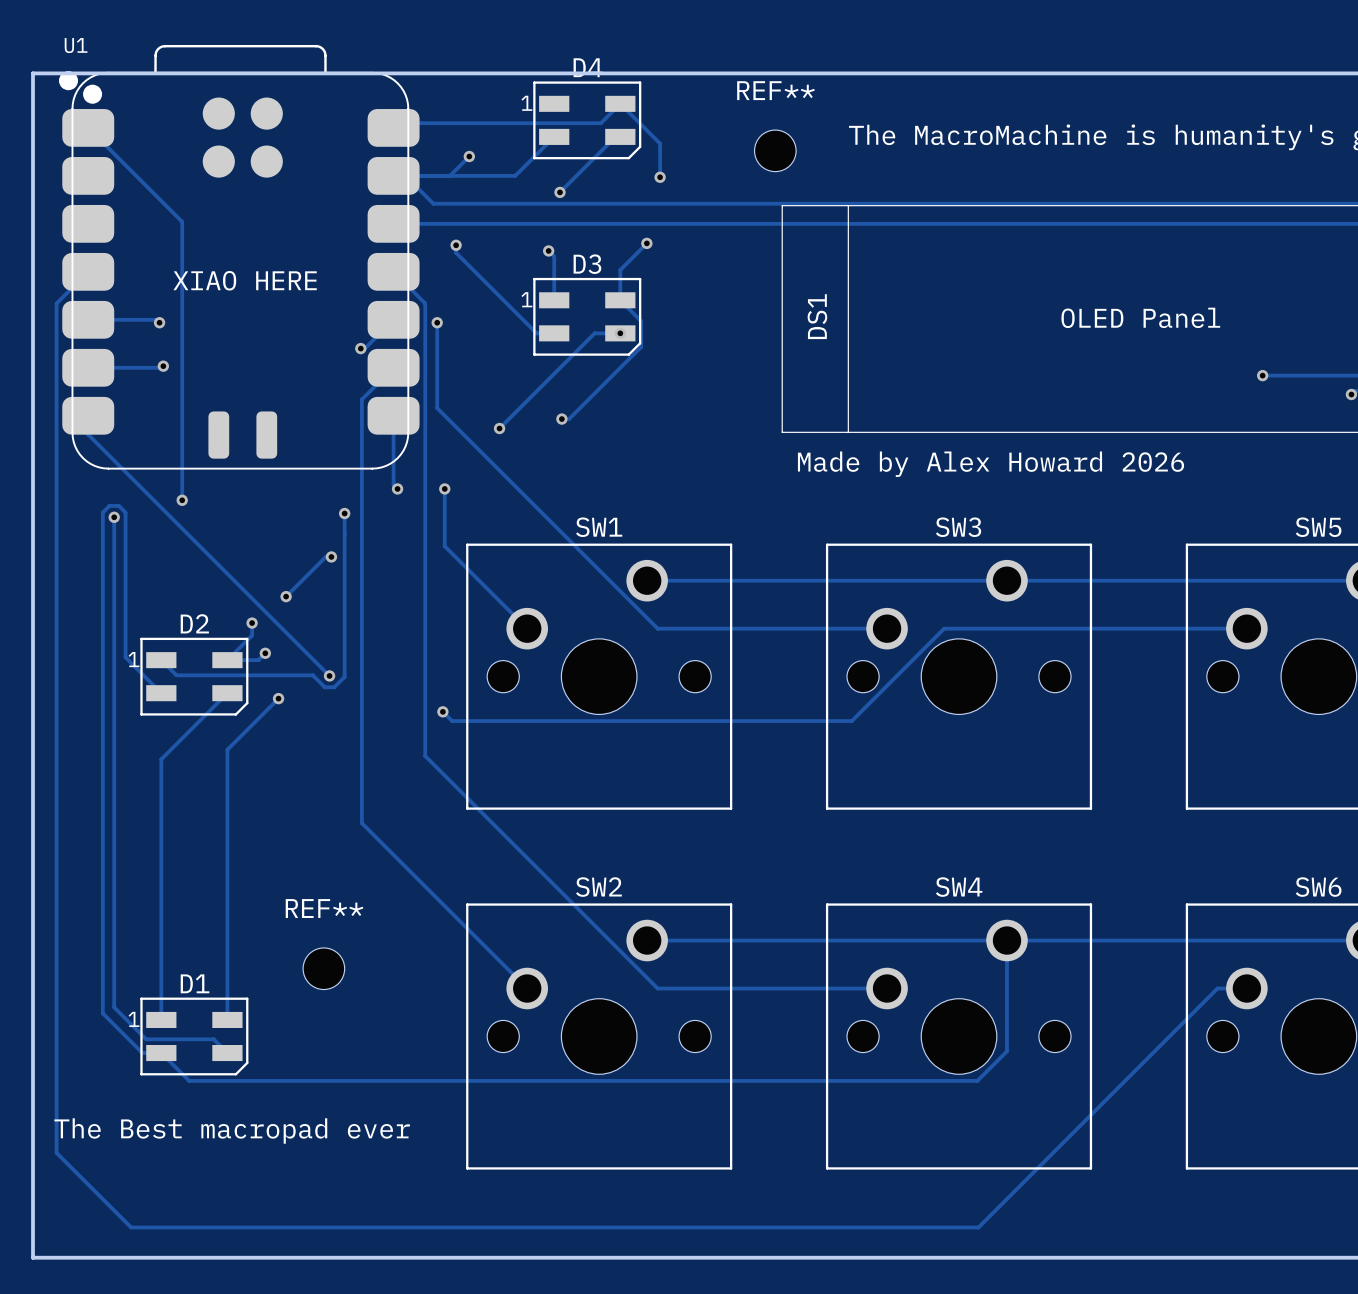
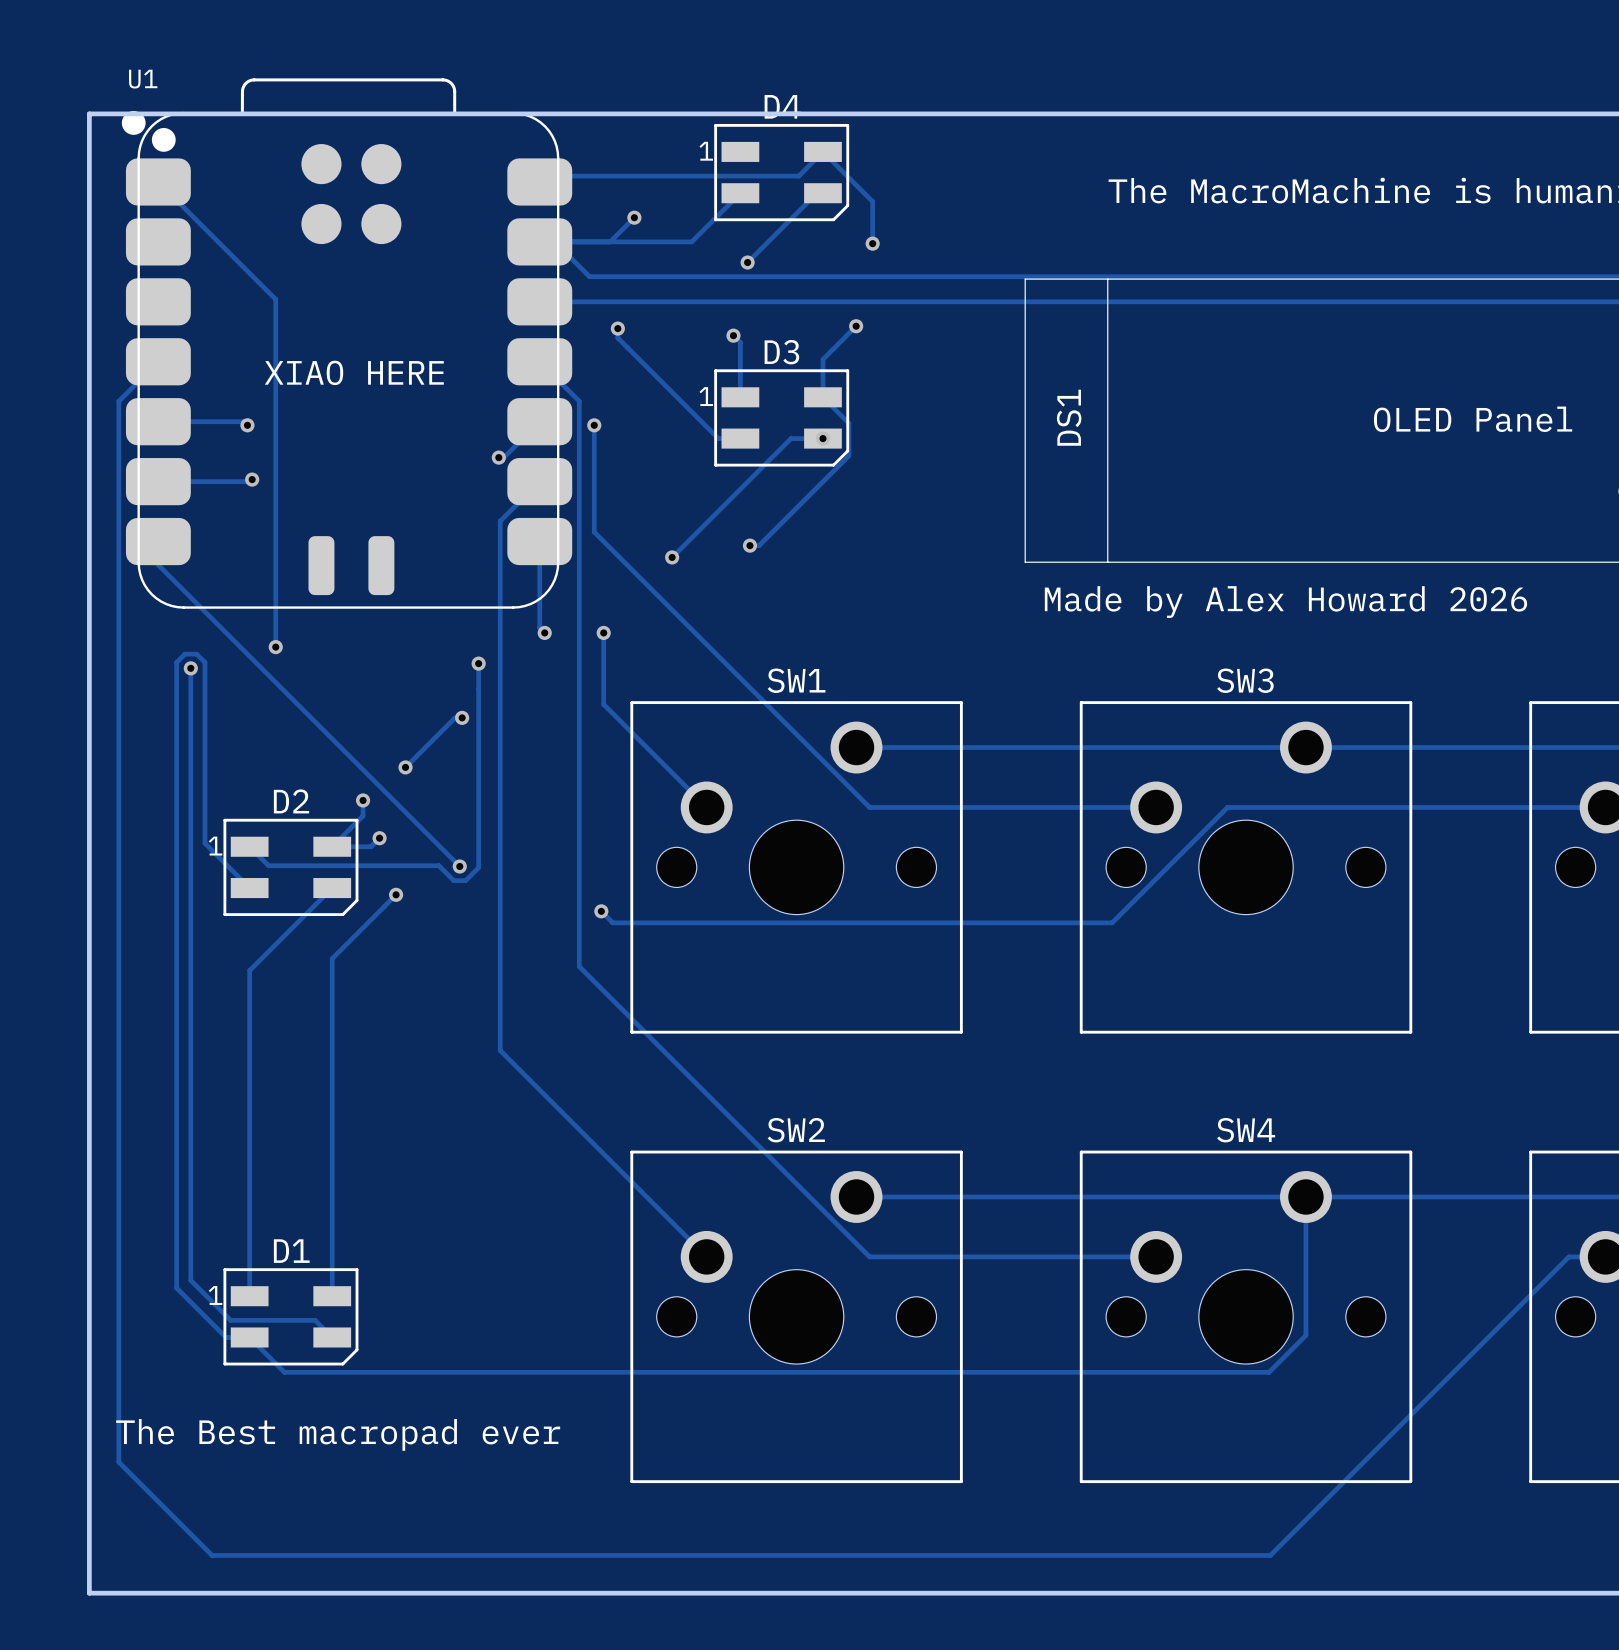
REF**: (775, 150) -> none
REF**: (323, 968) -> none

